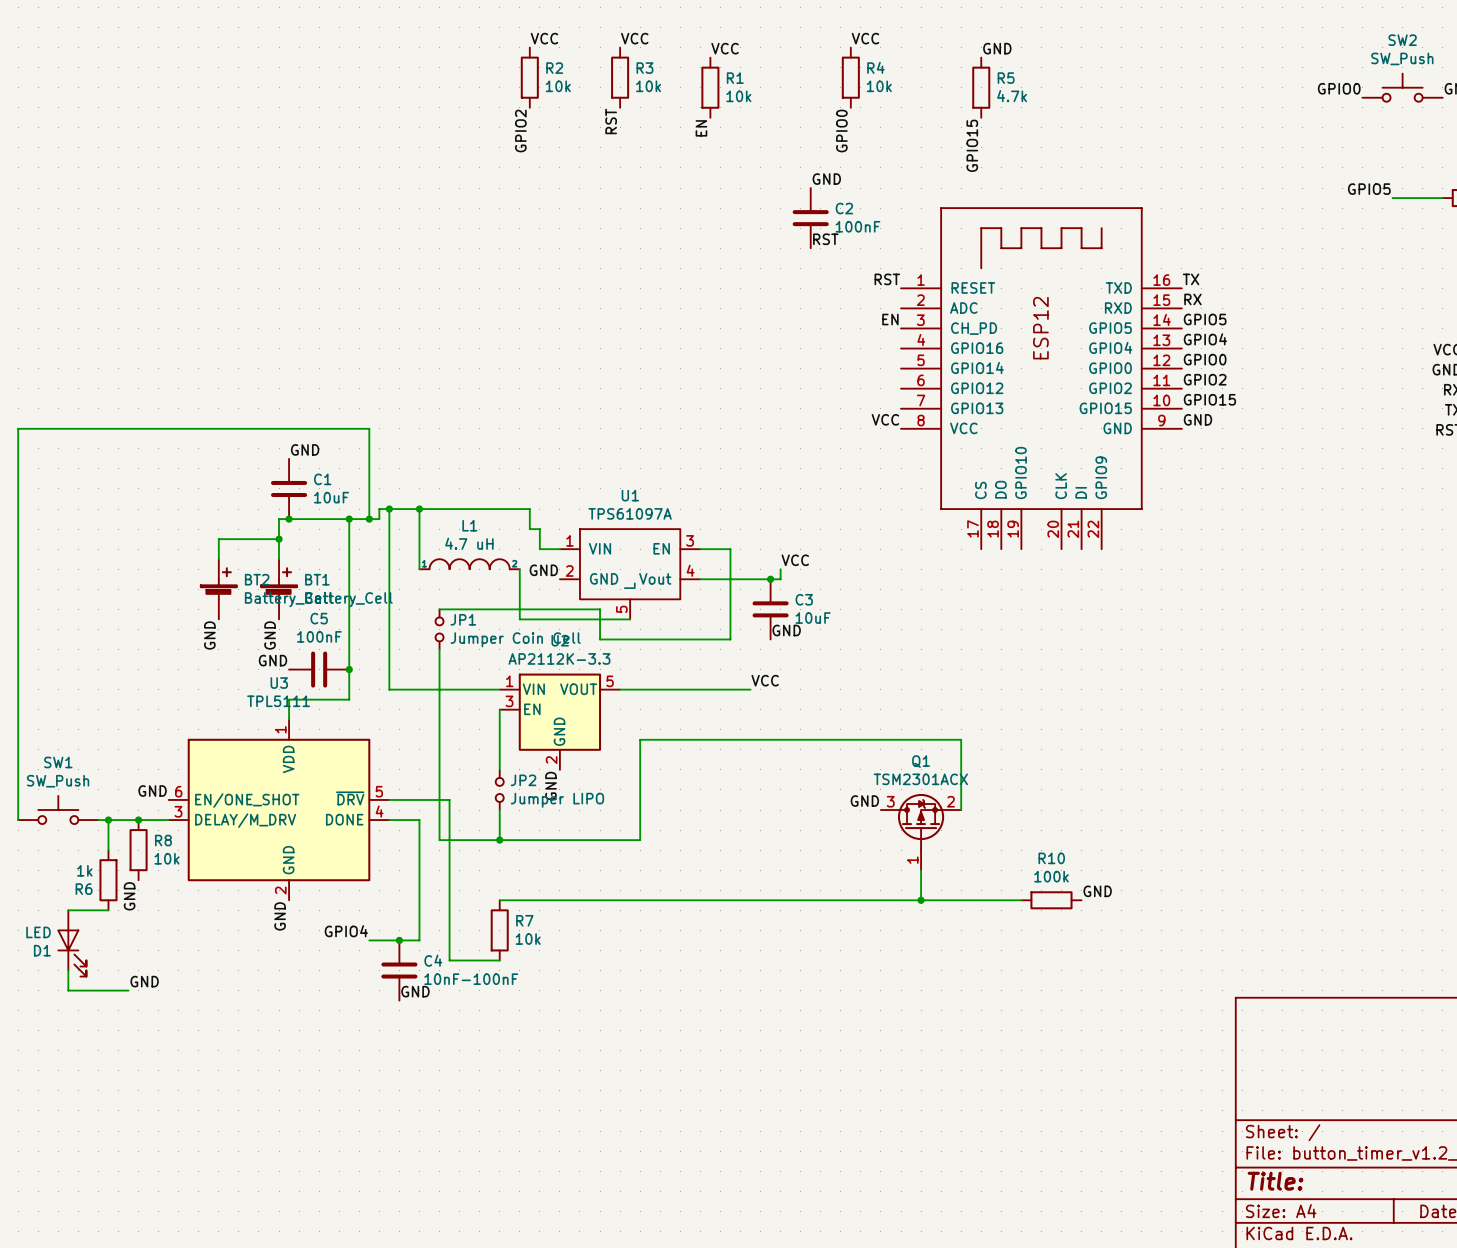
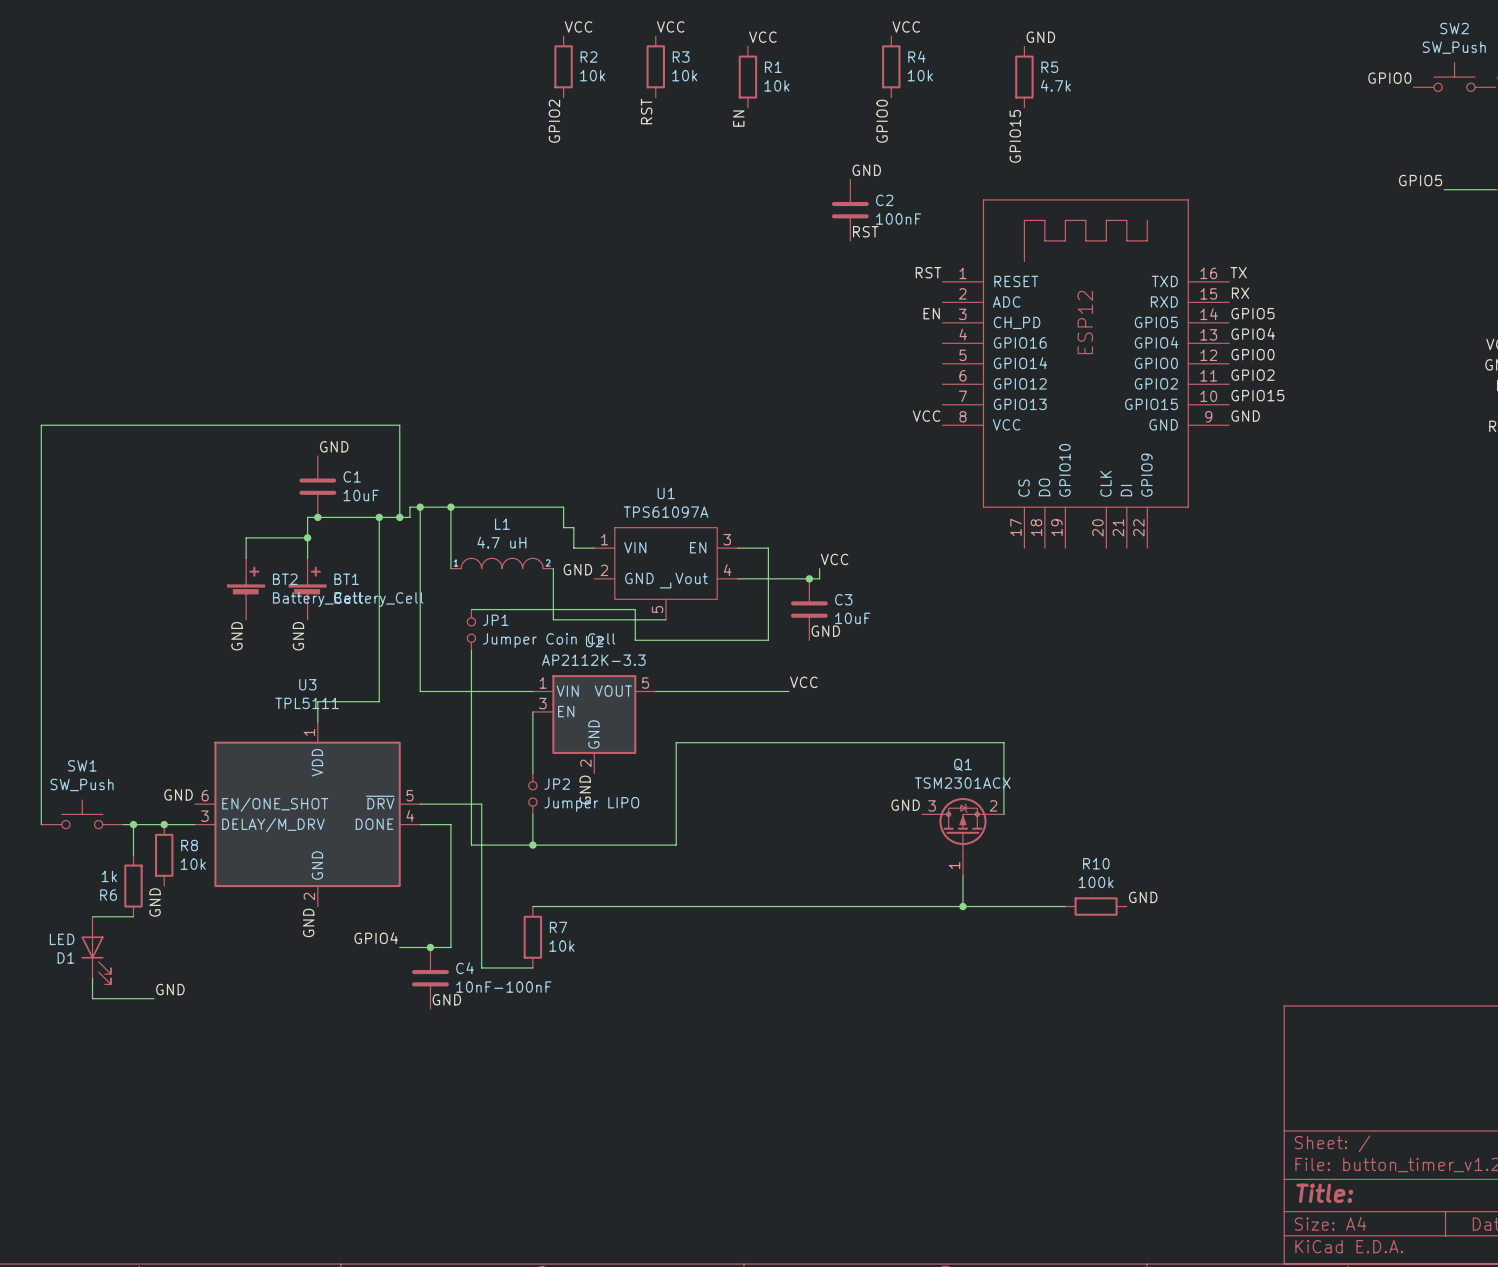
label: GND (272, 660) -> none
C5: 100nF (319, 669) -> none
junction: (349, 669) -> none

